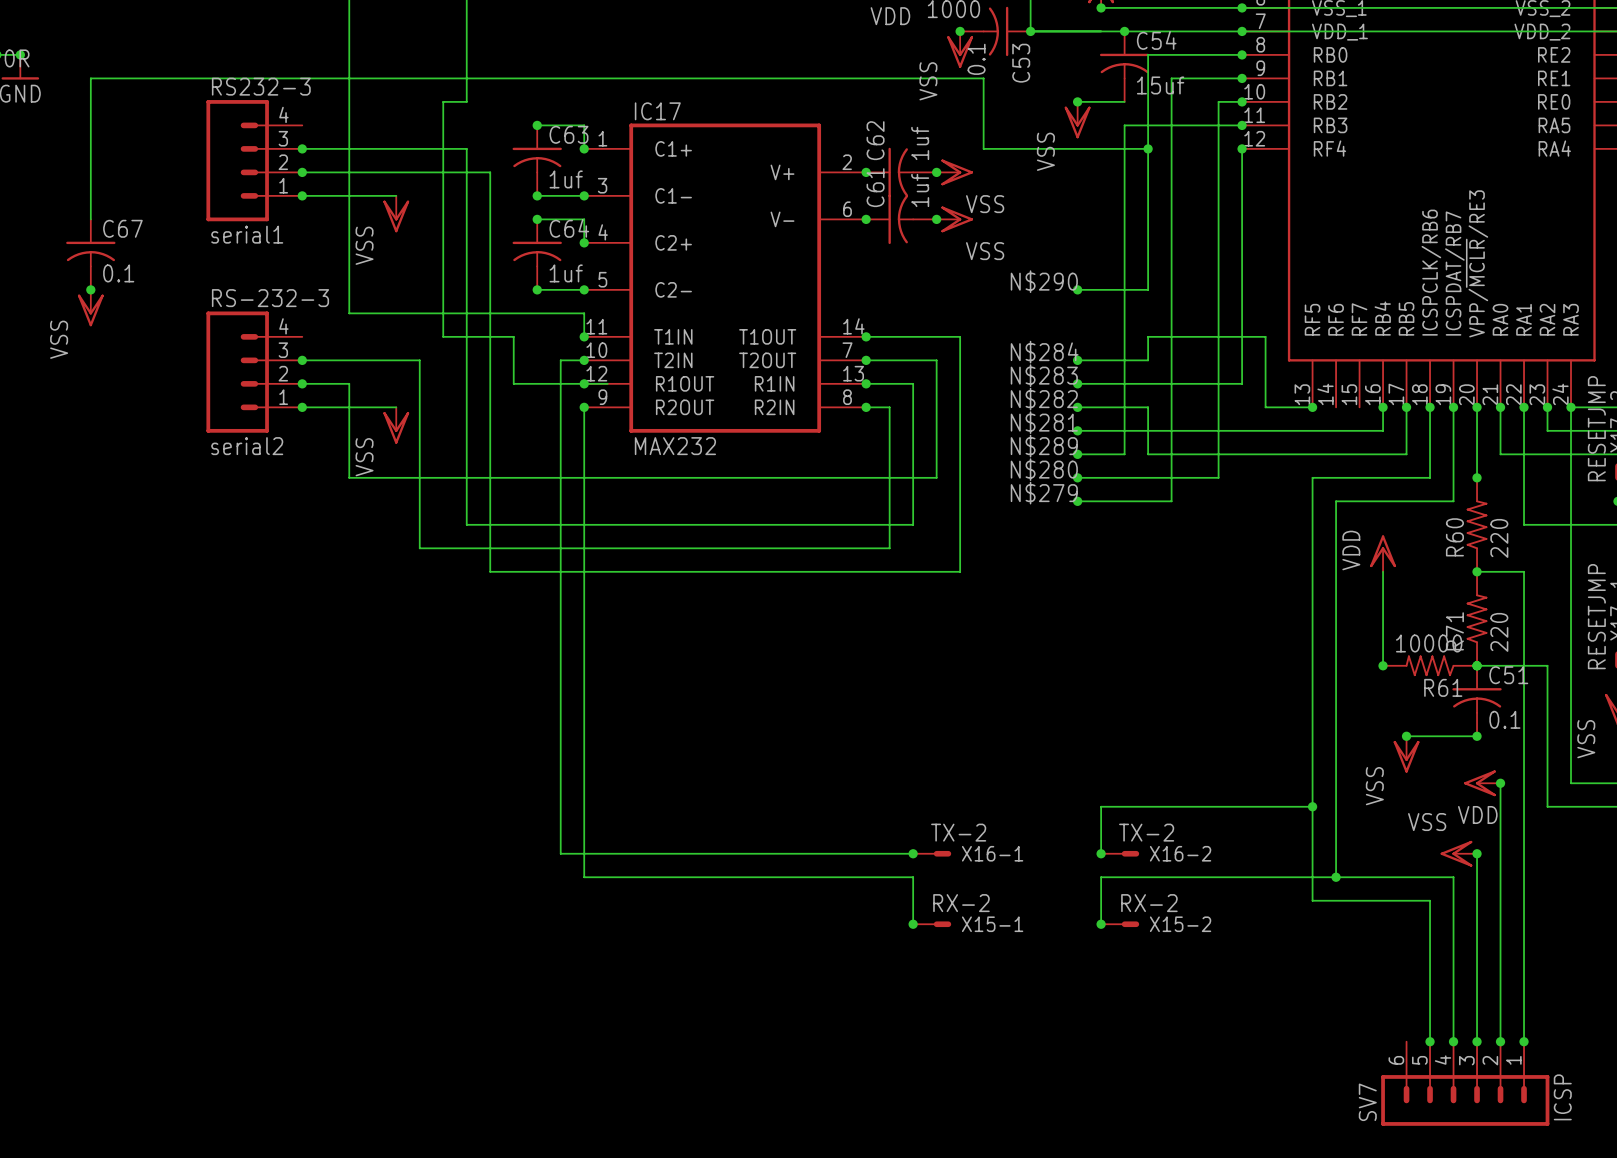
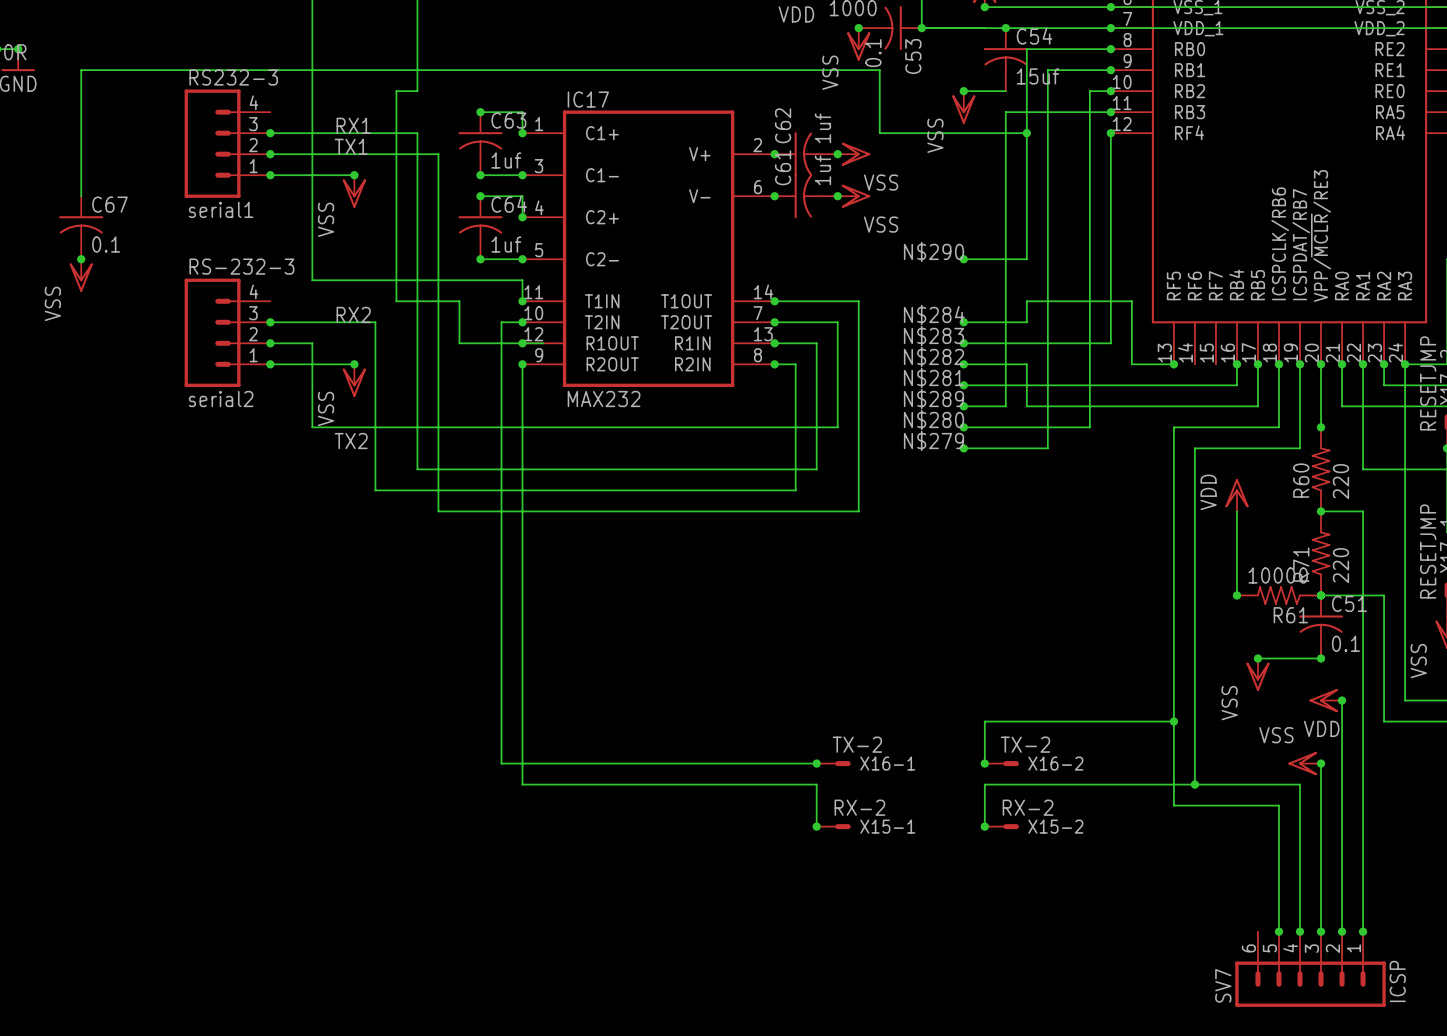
label: none -> RX1 (353, 125)
label: none -> TX1 (351, 146)
junction: none -> (354, 175)
label: none -> RX2 (353, 314)
junction: none -> (354, 364)
label: none -> TX2 (351, 441)

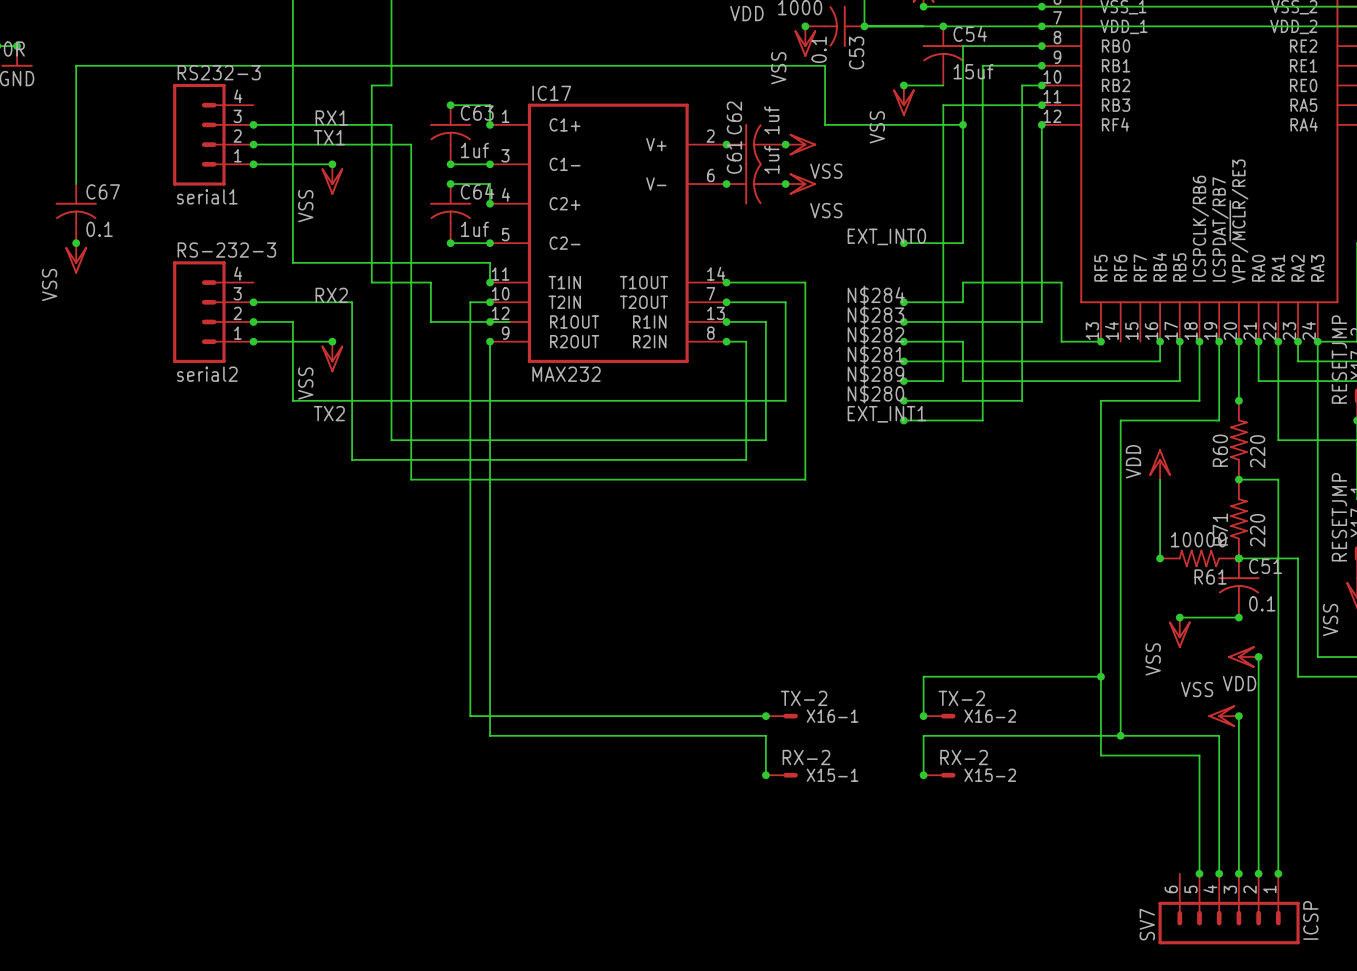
label: N$290 (933, 251) -> EXT_INT0 (886, 236)
label: N$279 (933, 441) -> EXT_INT1 (886, 414)

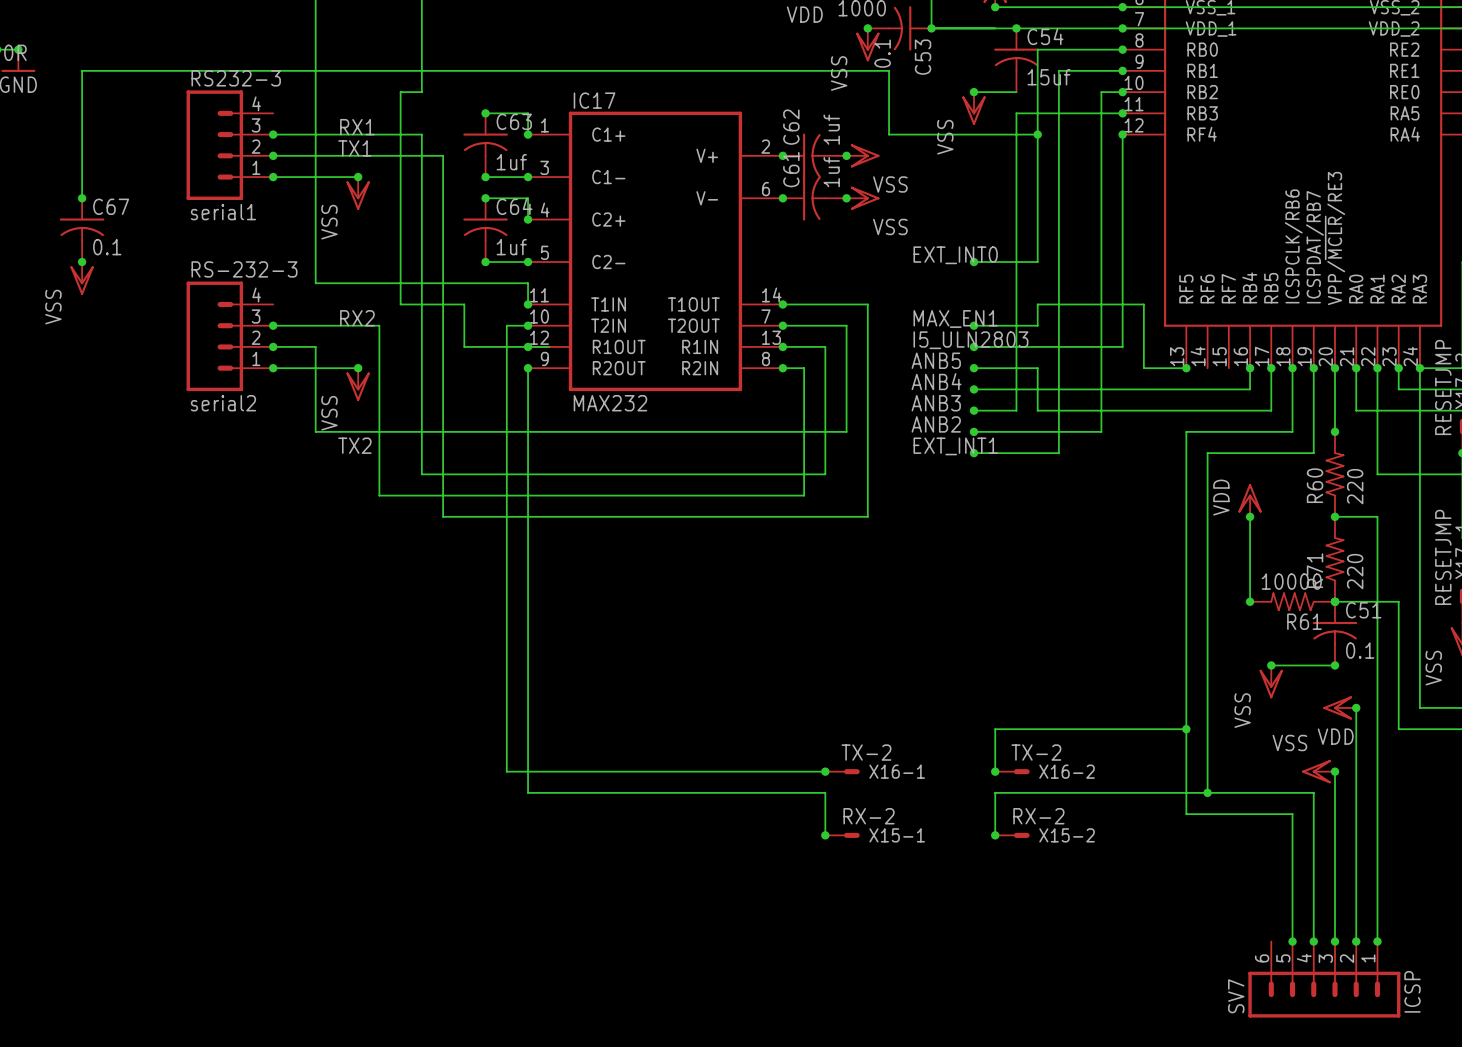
junction: none -> (82, 198)
label: N$284 (876, 295) -> MAX_EN1 (955, 318)
label: N$283 (875, 315) -> I5_ULN2803 (970, 340)
label: N$282 (875, 334) -> ANB5 (936, 360)
label: N$281 (875, 354) -> ANB4 (936, 381)
label: N$289 (875, 374) -> ANB3 (936, 403)
label: N$280 (875, 393) -> ANB2 (936, 424)
junction: none -> (1250, 516)

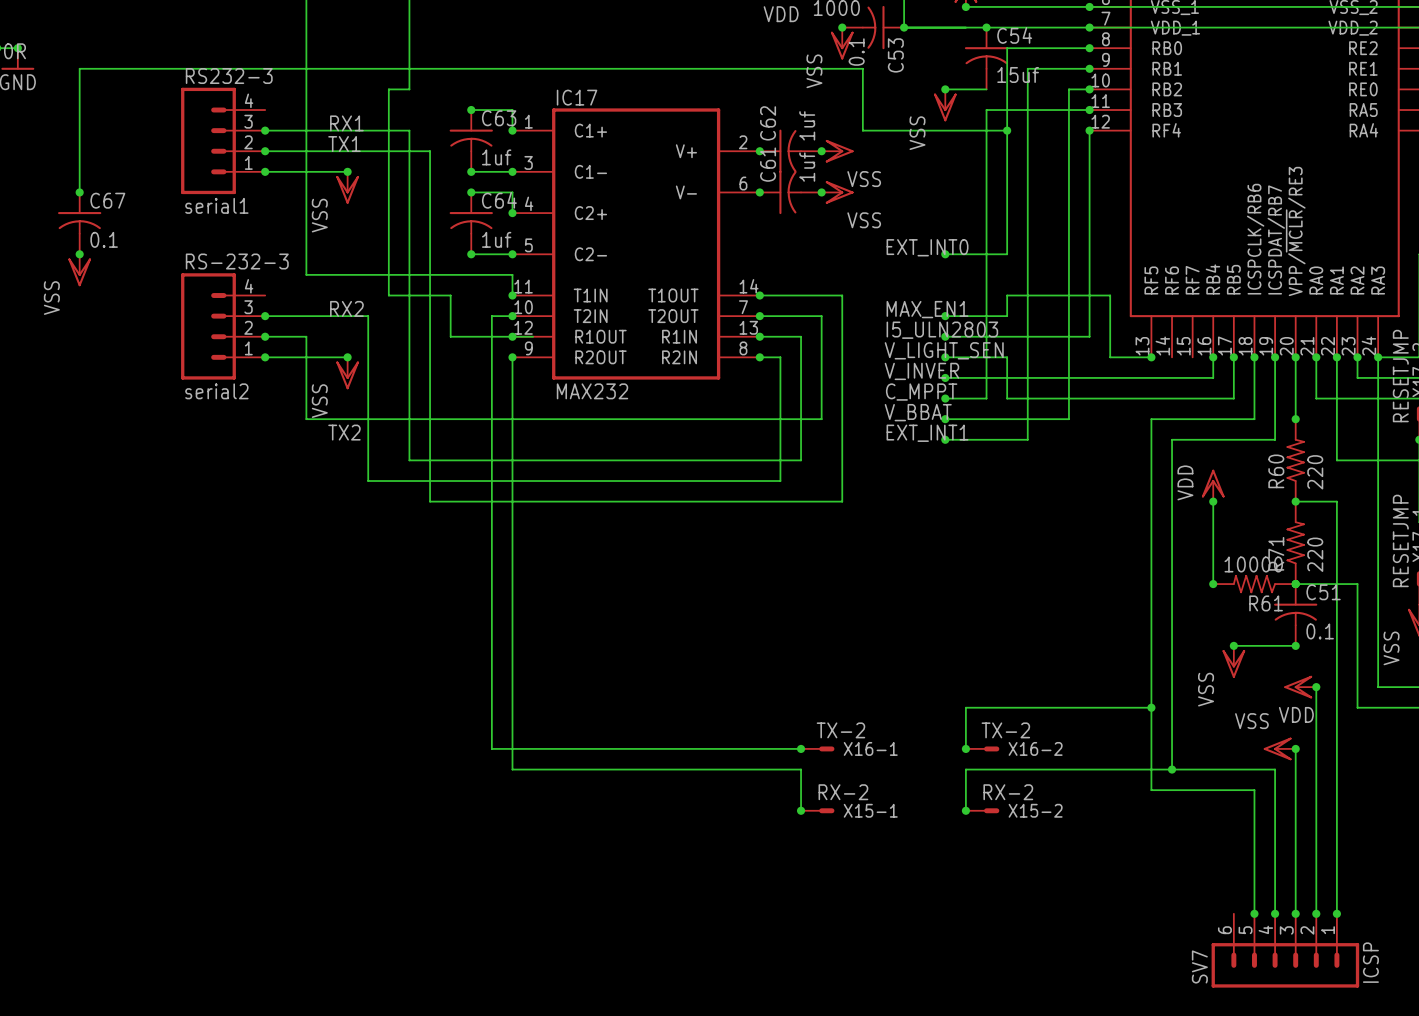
label: ANB5 (936, 360) -> V_LIGHT_SEN (944, 350)
label: ANB4 (936, 381) -> V_INVER (921, 371)
label: ANB3 (936, 403) -> C_MPPT (921, 392)
label: ANB2 (936, 424) -> V_BBAT (918, 412)

